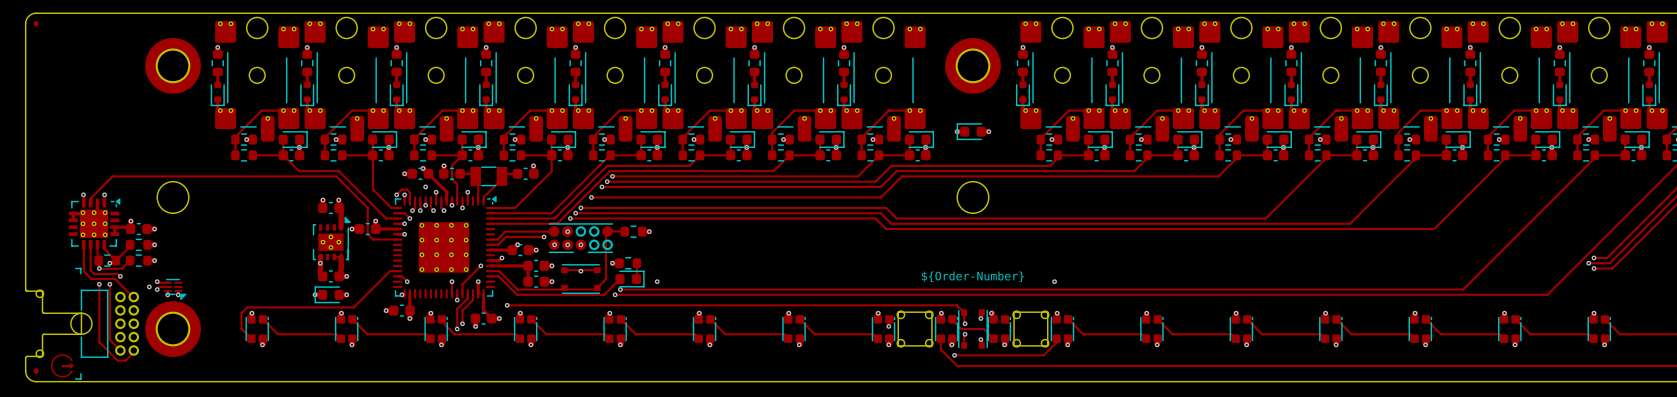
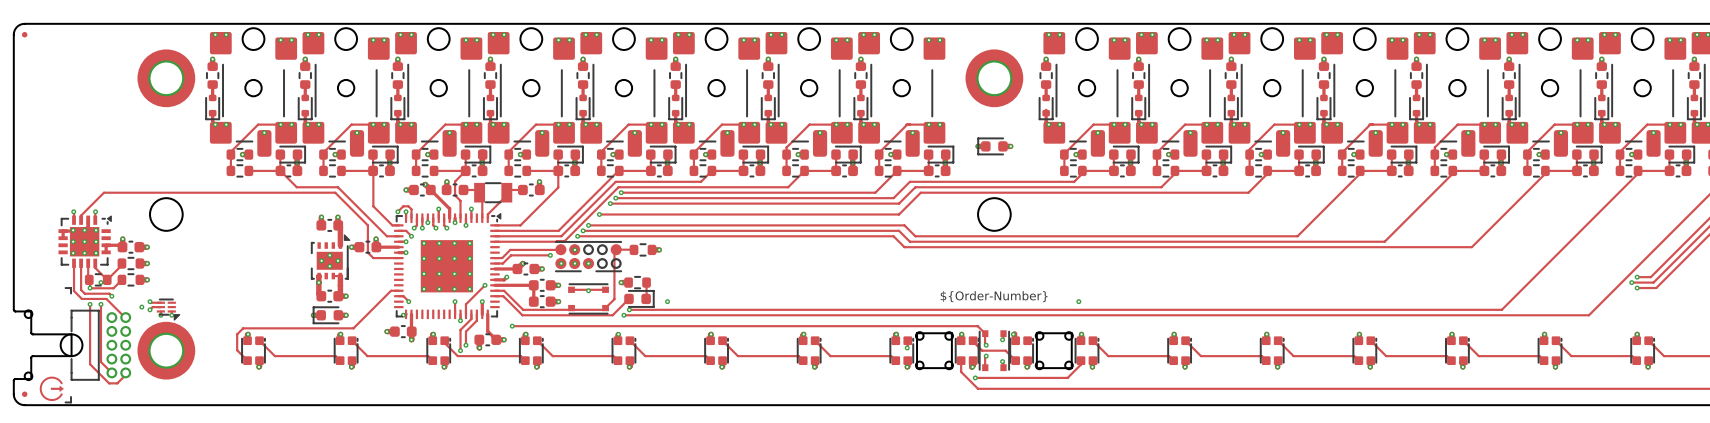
via: (425, 186) -> none

